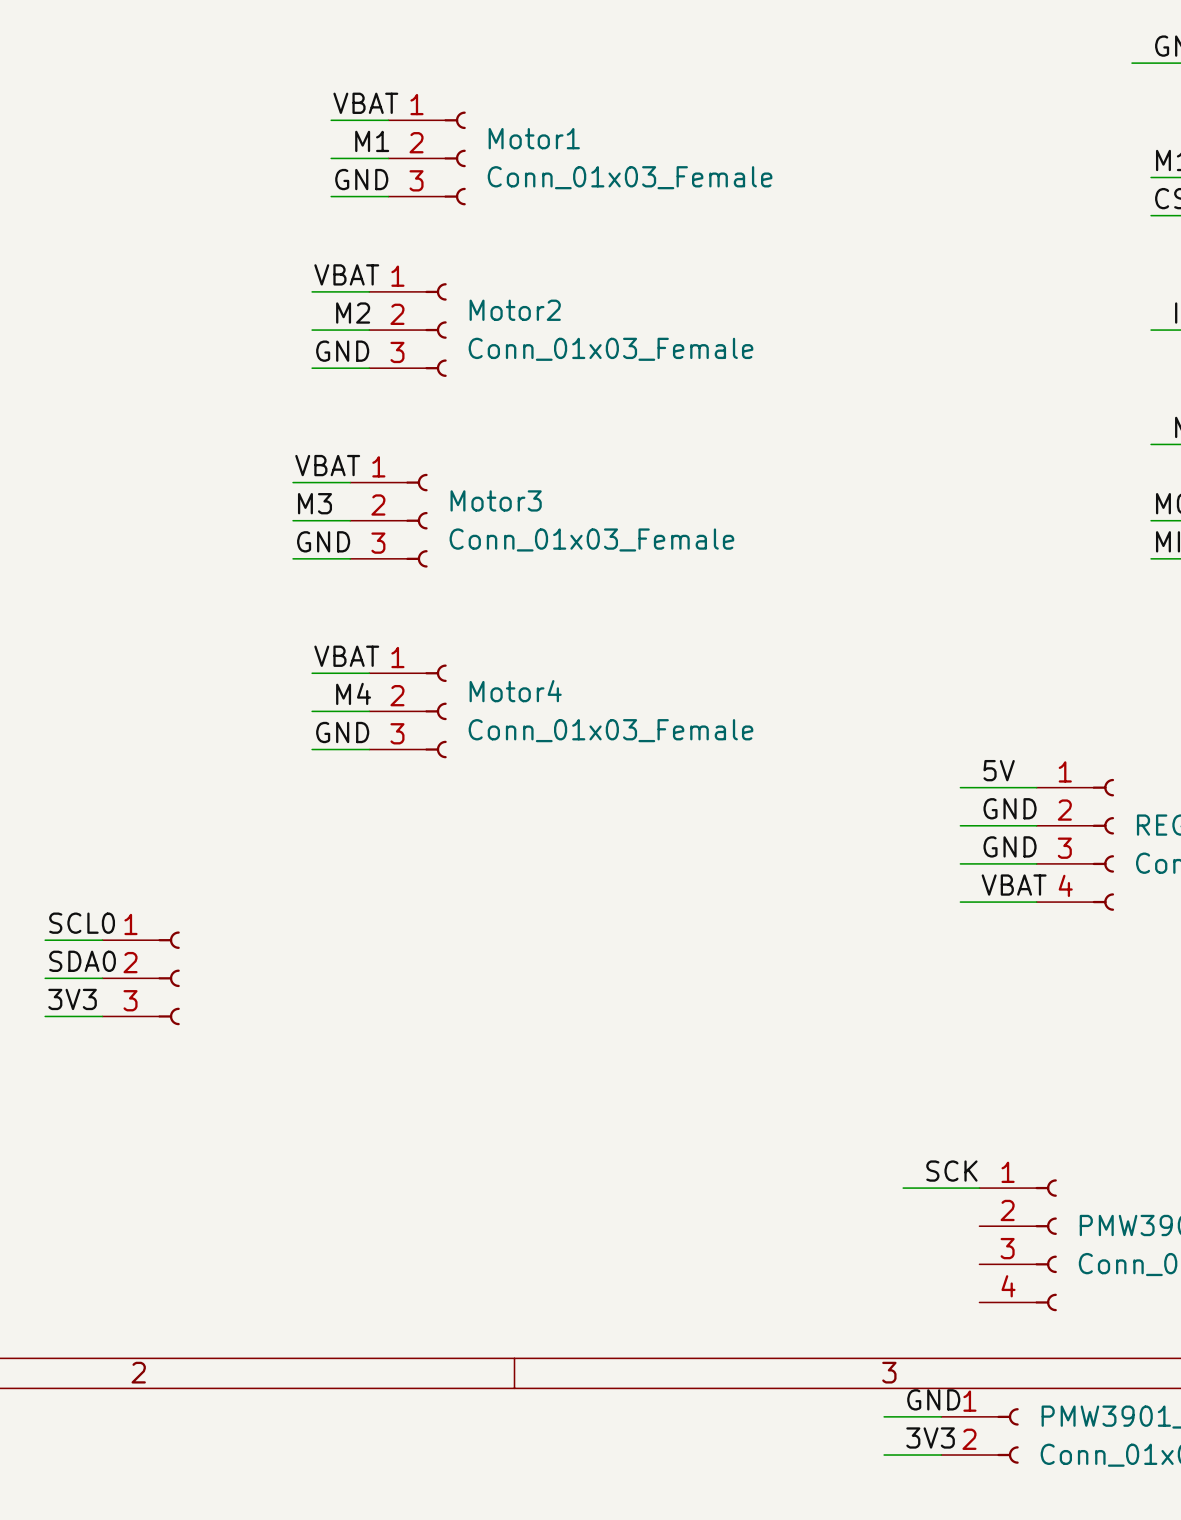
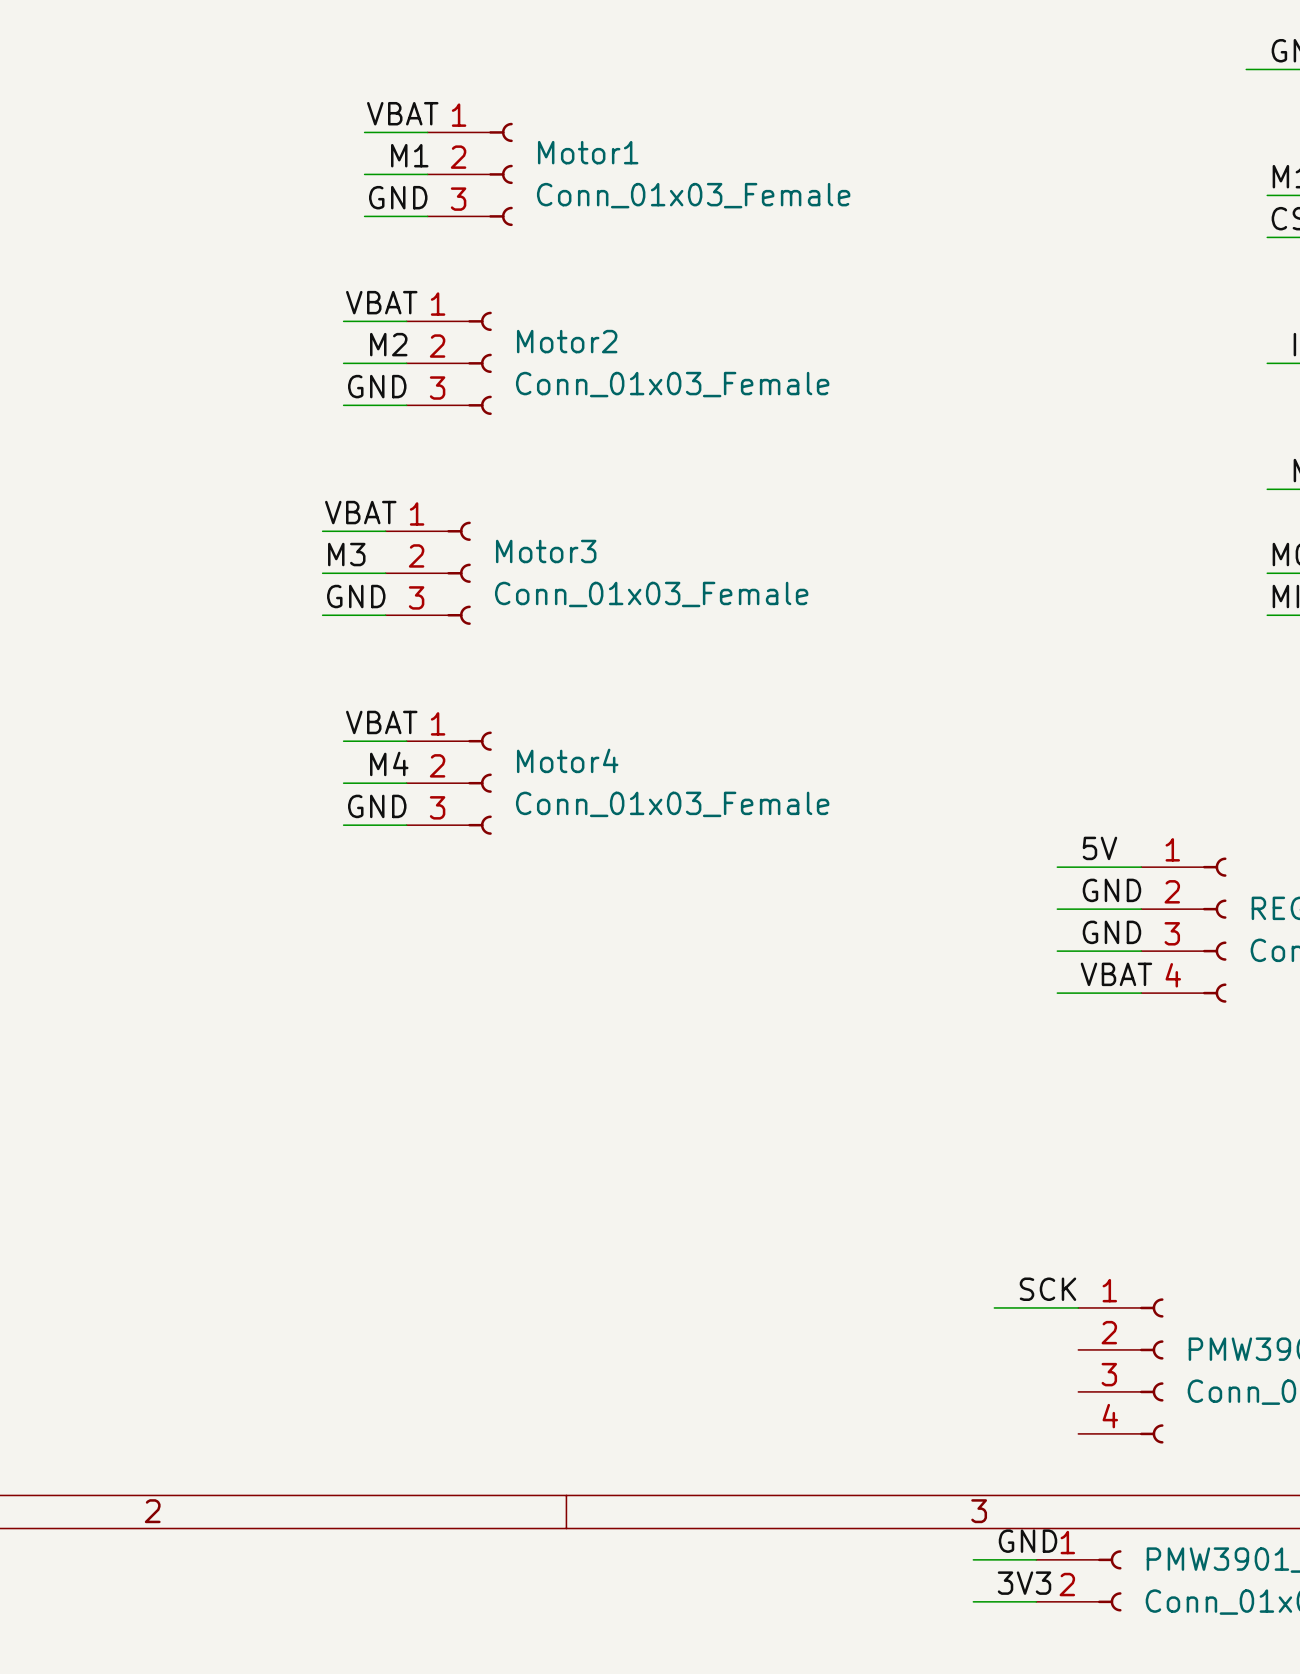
label: SCL0 (82, 923) -> none
wire: (45, 940) (102, 940) -> none
label: SDA0 (82, 961) -> none
wire: (45, 978) (102, 978) -> none
part: (141, 978) -> none
label: 3V3 (72, 999) -> none
wire: (45, 1016) (102, 1016) -> none

